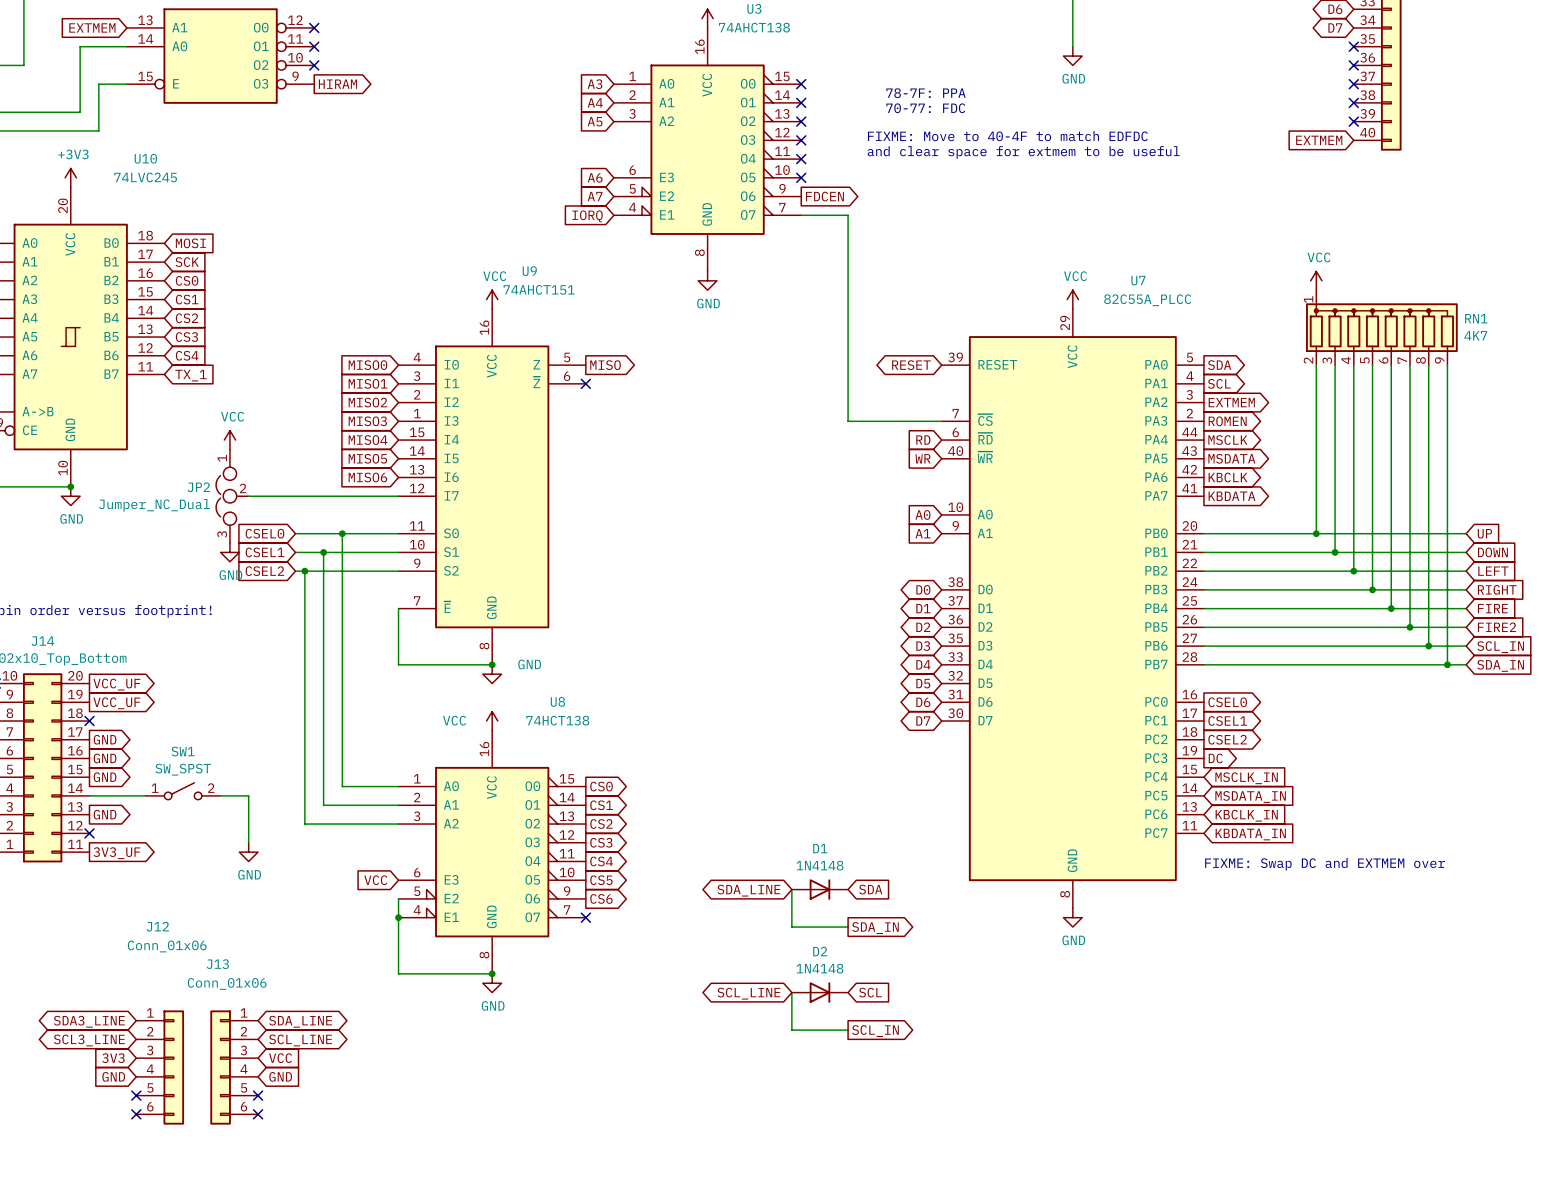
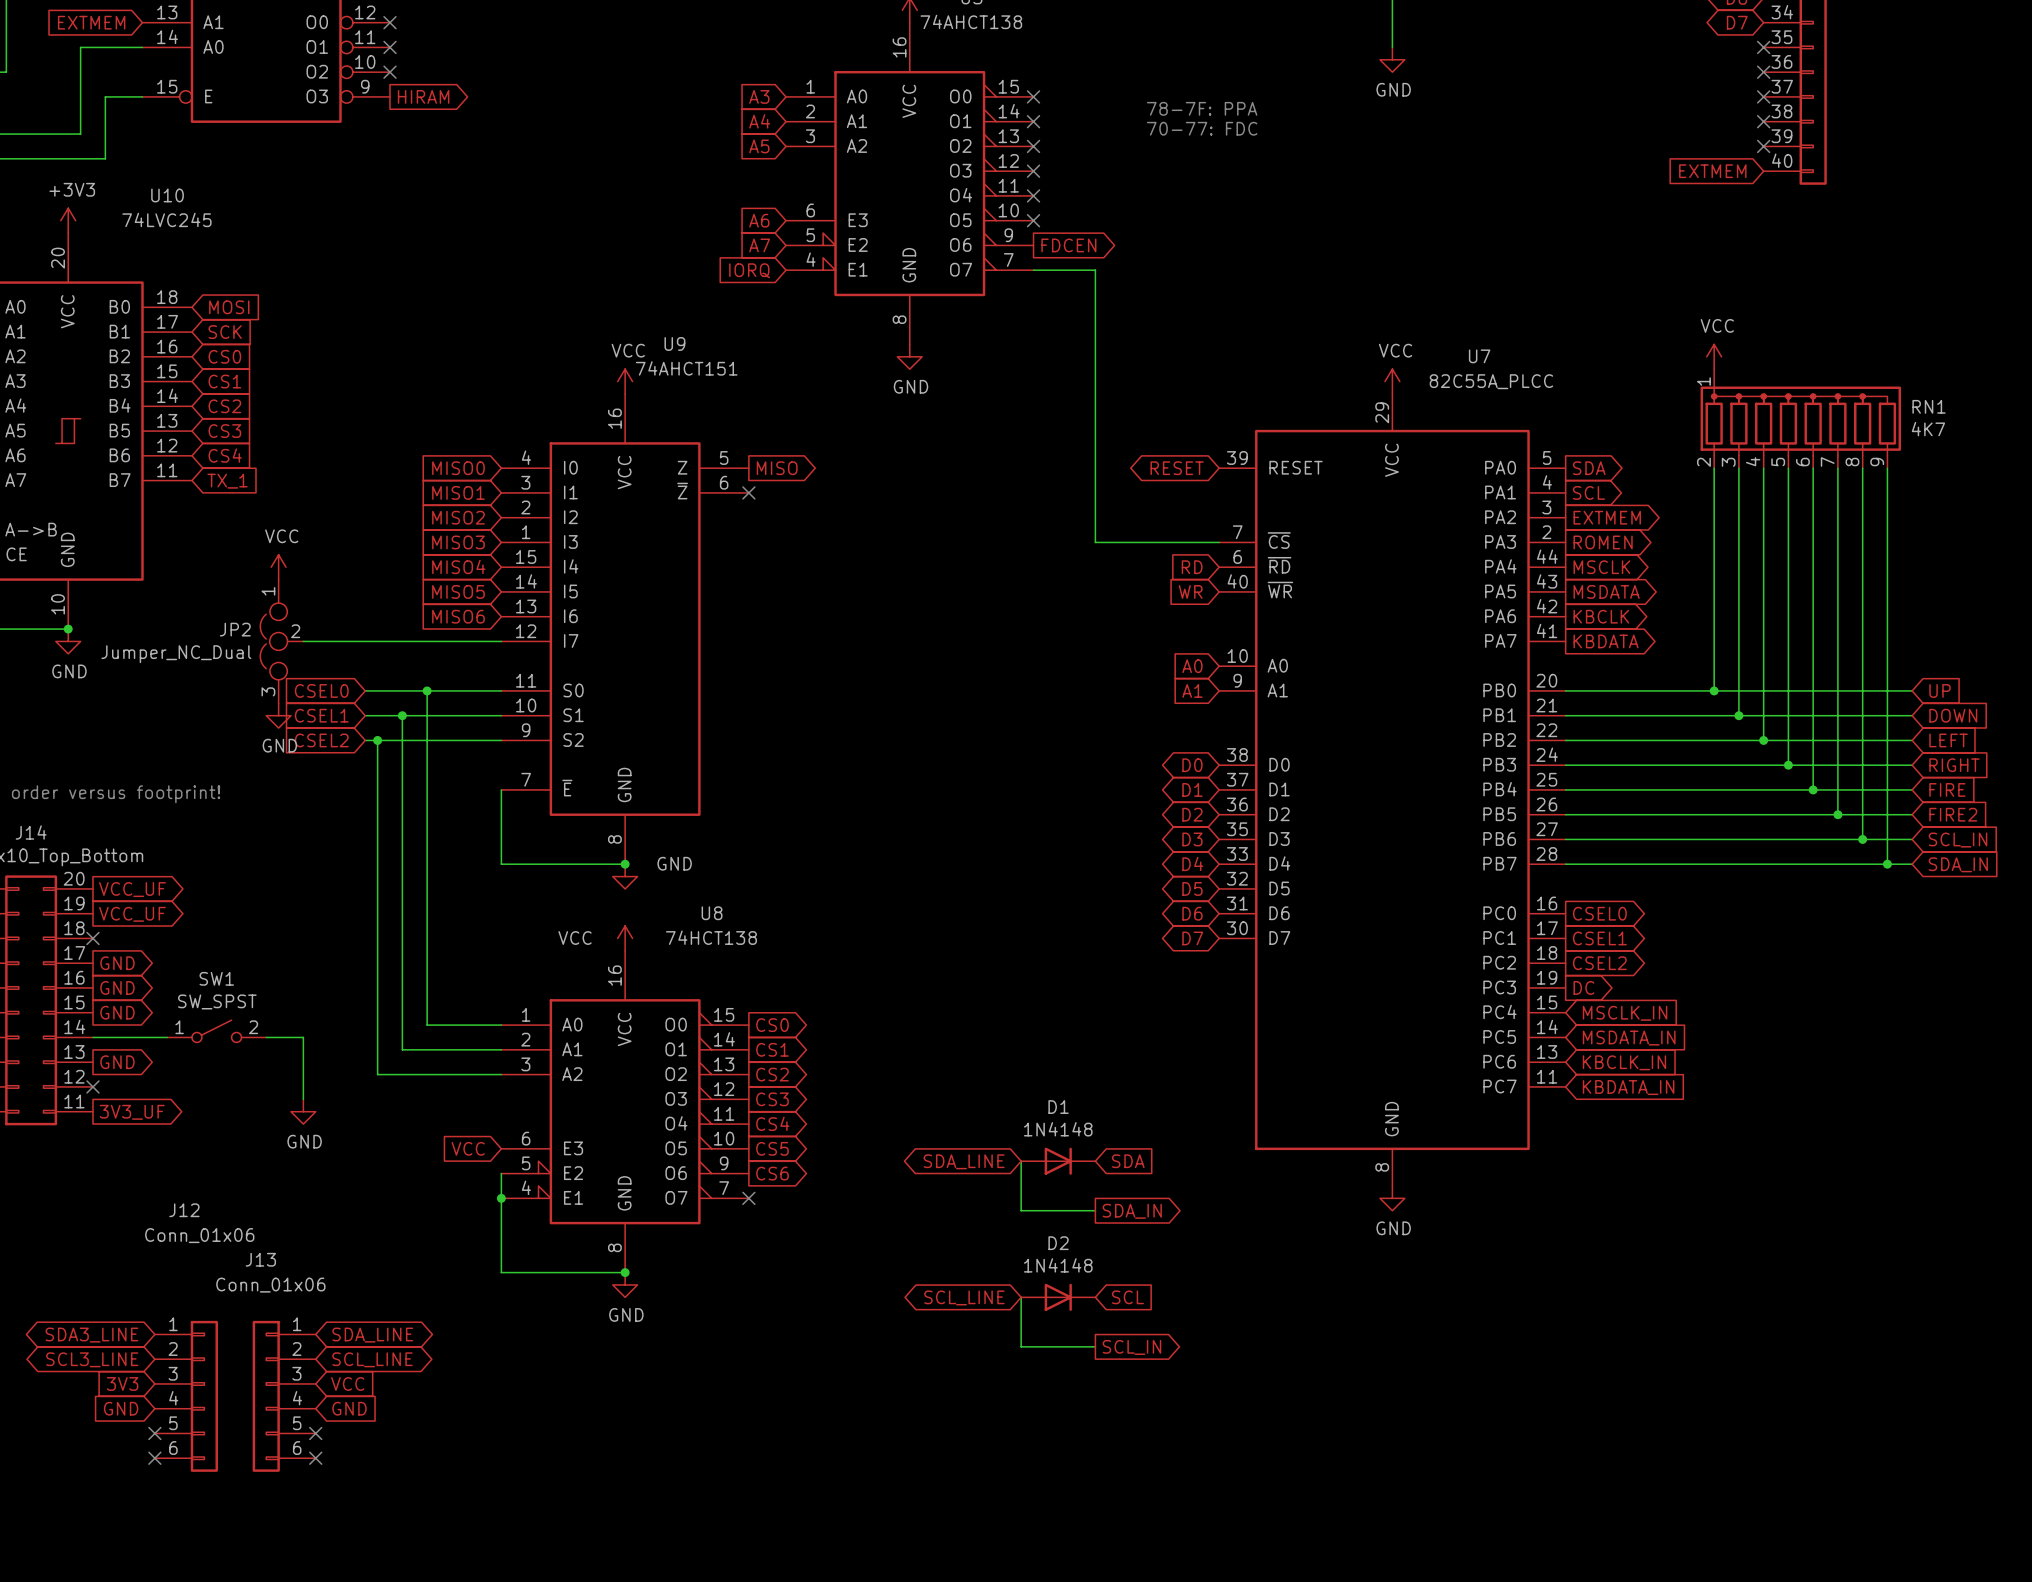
text: FIXME: Move to 40-4F to match EDFDC (1007, 136) -> none
text: and clear space for extmem to be useful (1023, 152) -> none
text: FIXME: Swap DC and EXTMEM over (1325, 864) -> none

